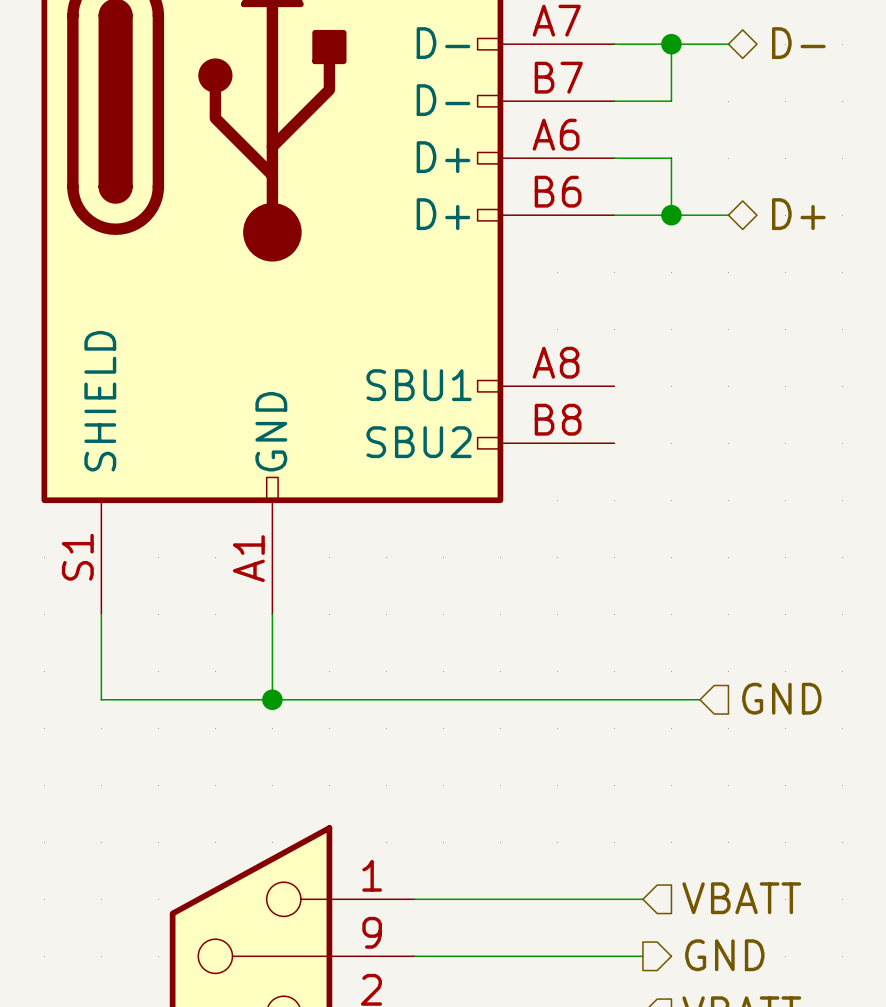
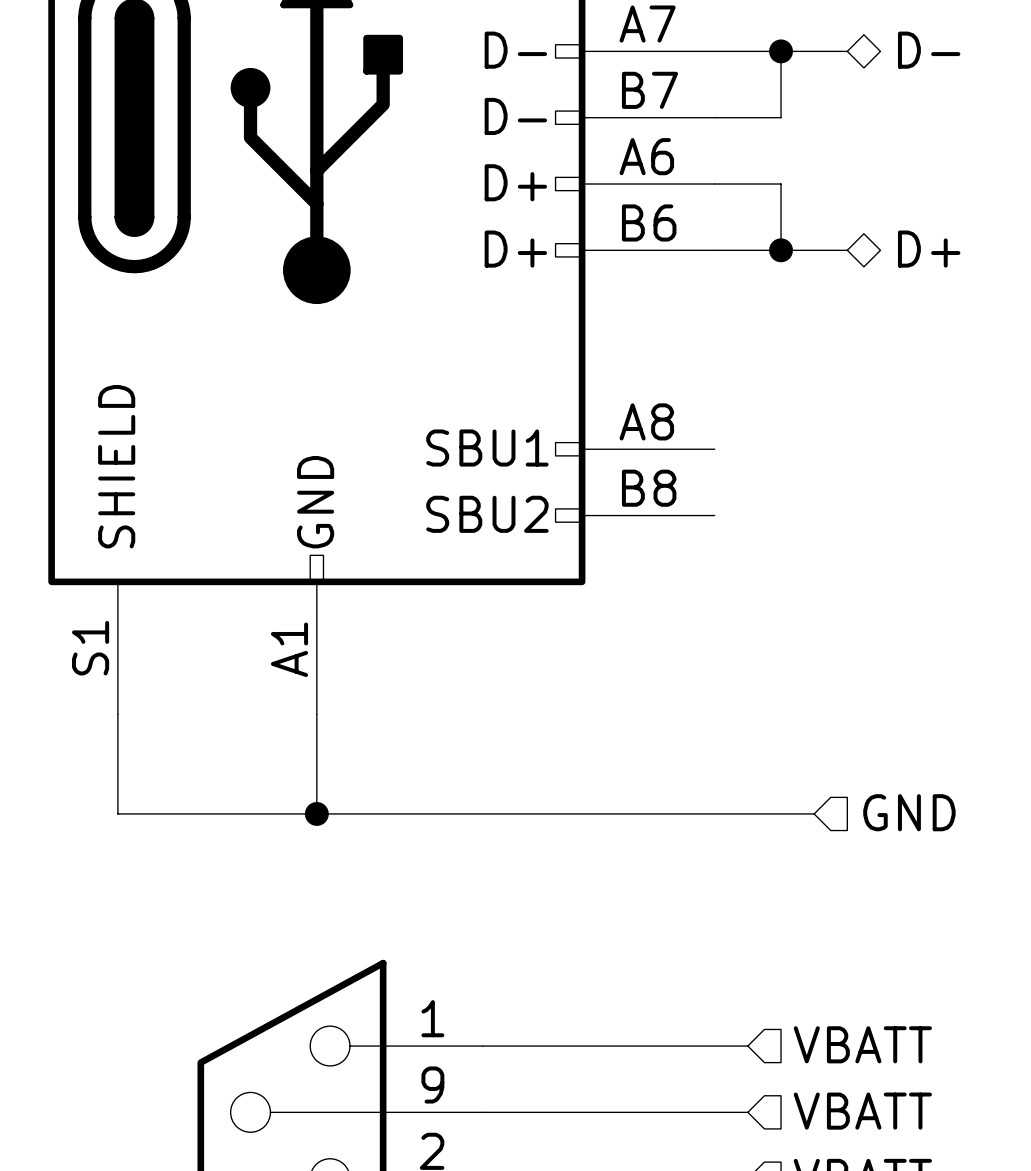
hierarchical label shape: output (724, 955) -> input (862, 1111)
hierarchical label: GND (724, 955) -> VBATT (862, 1111)

